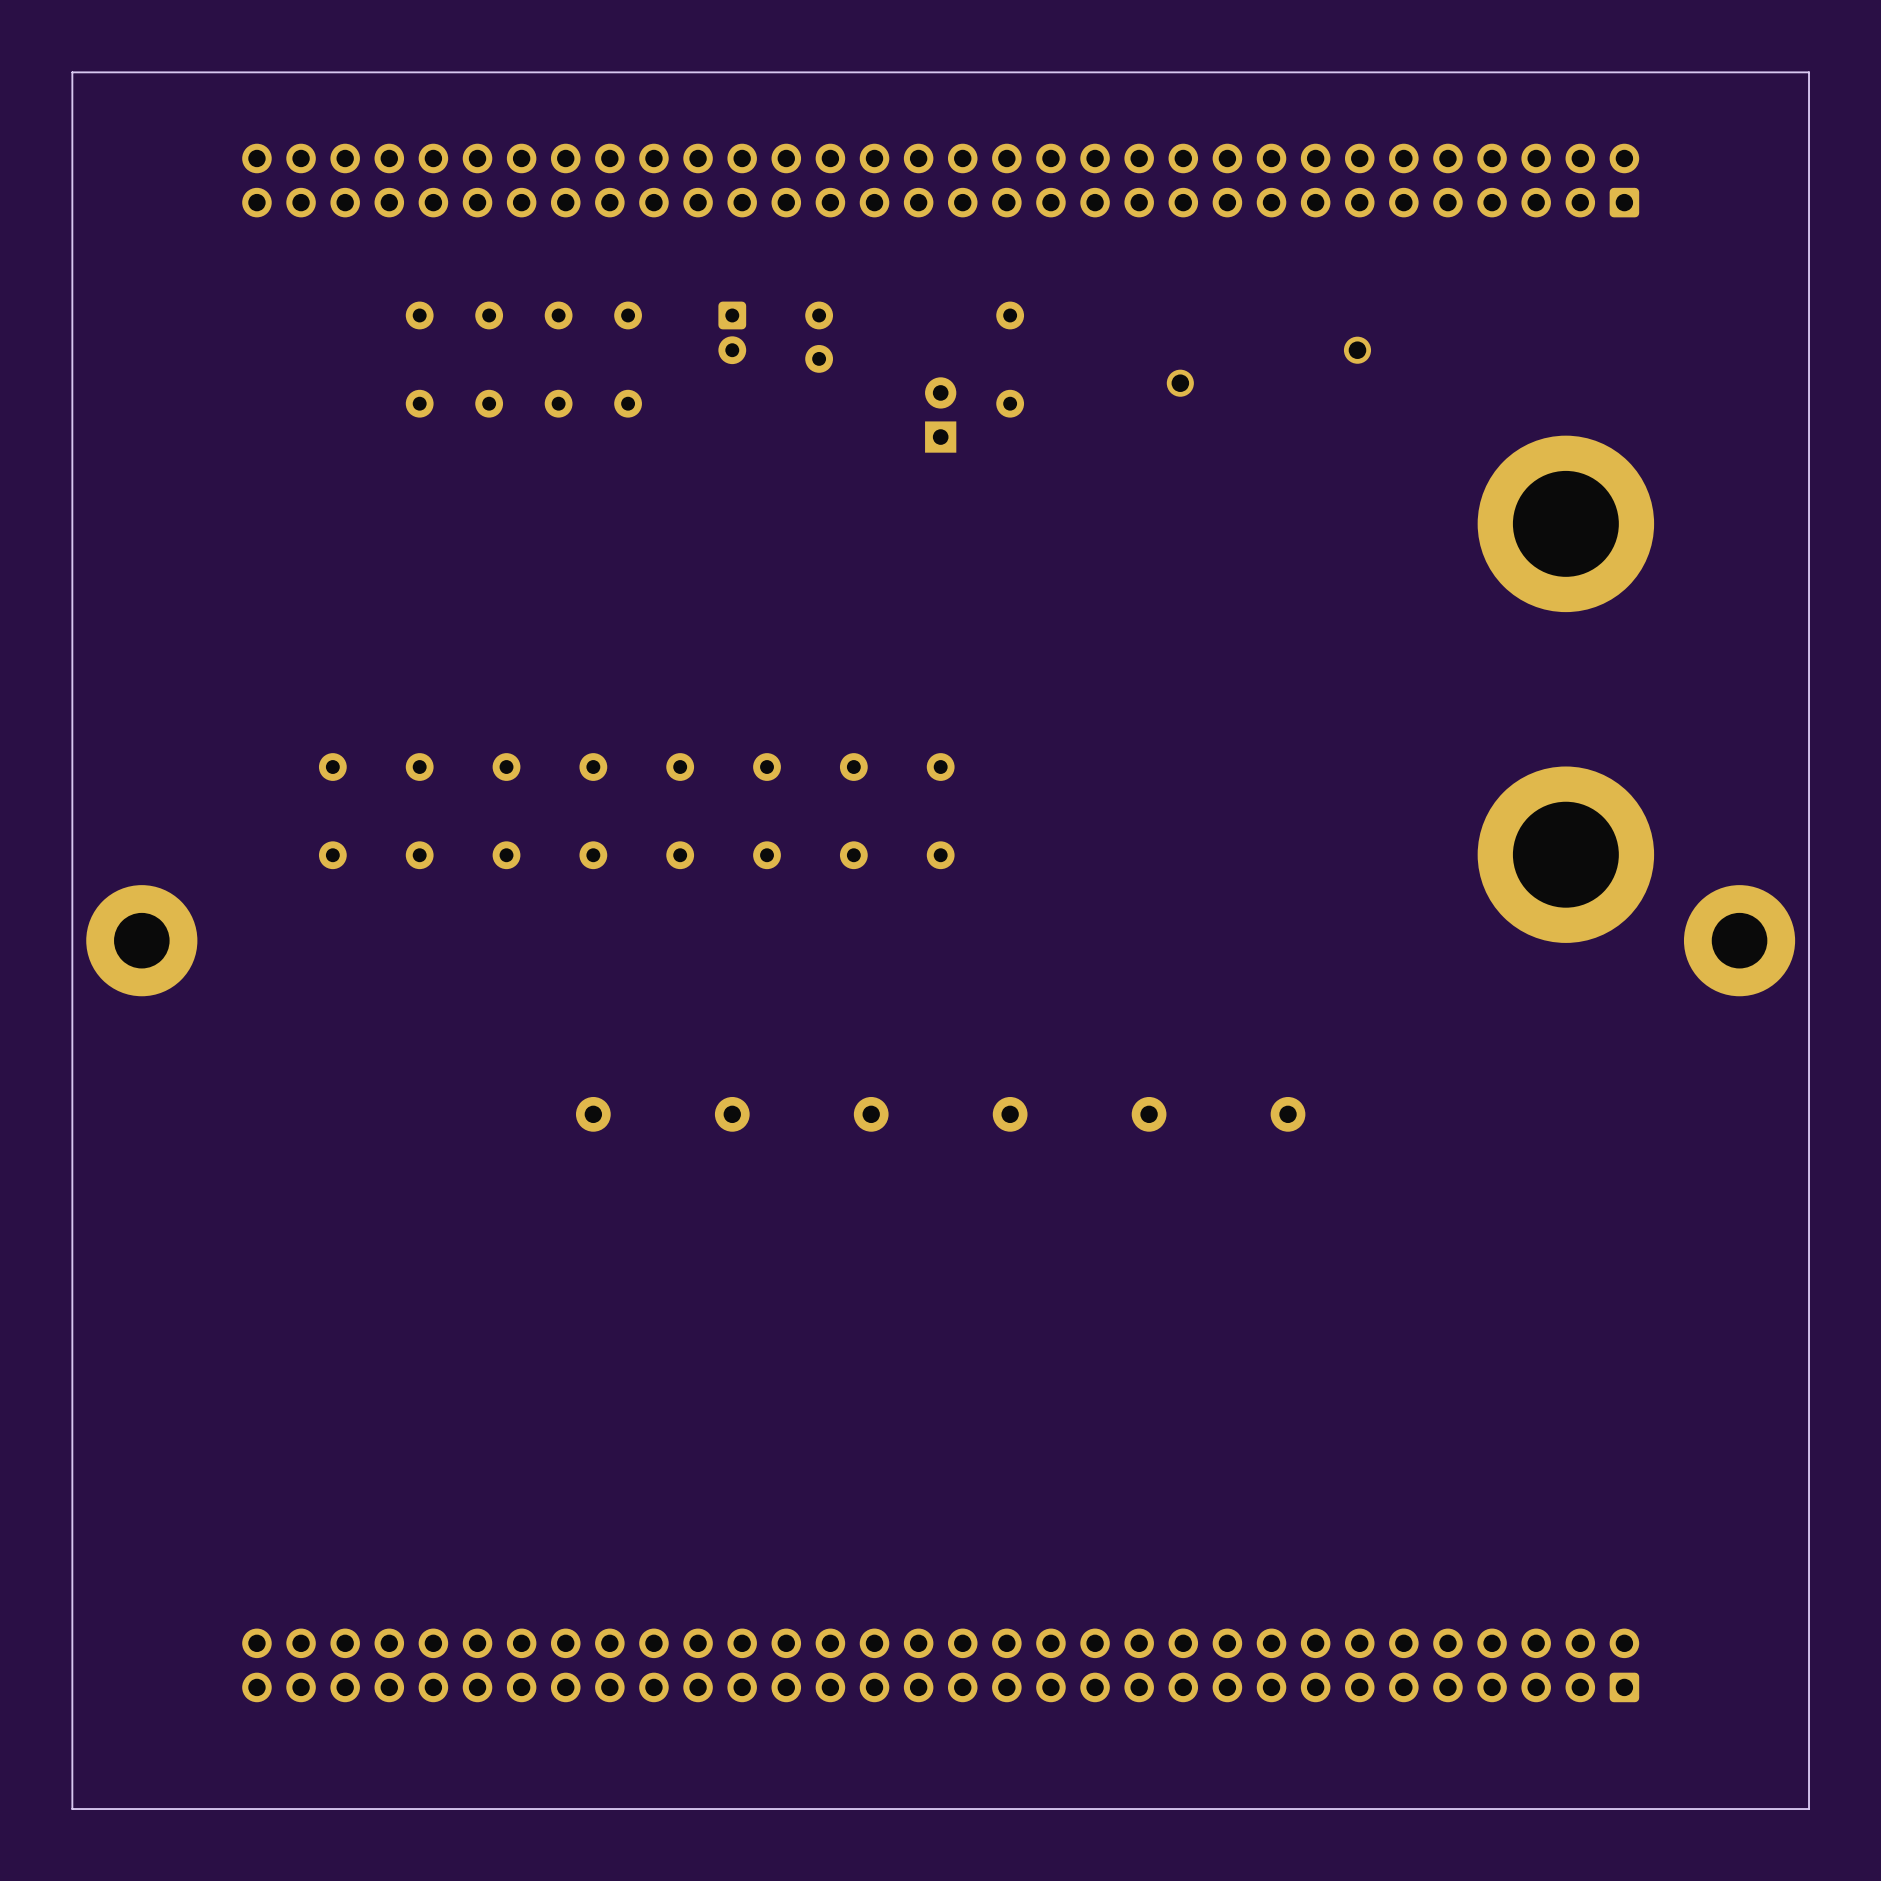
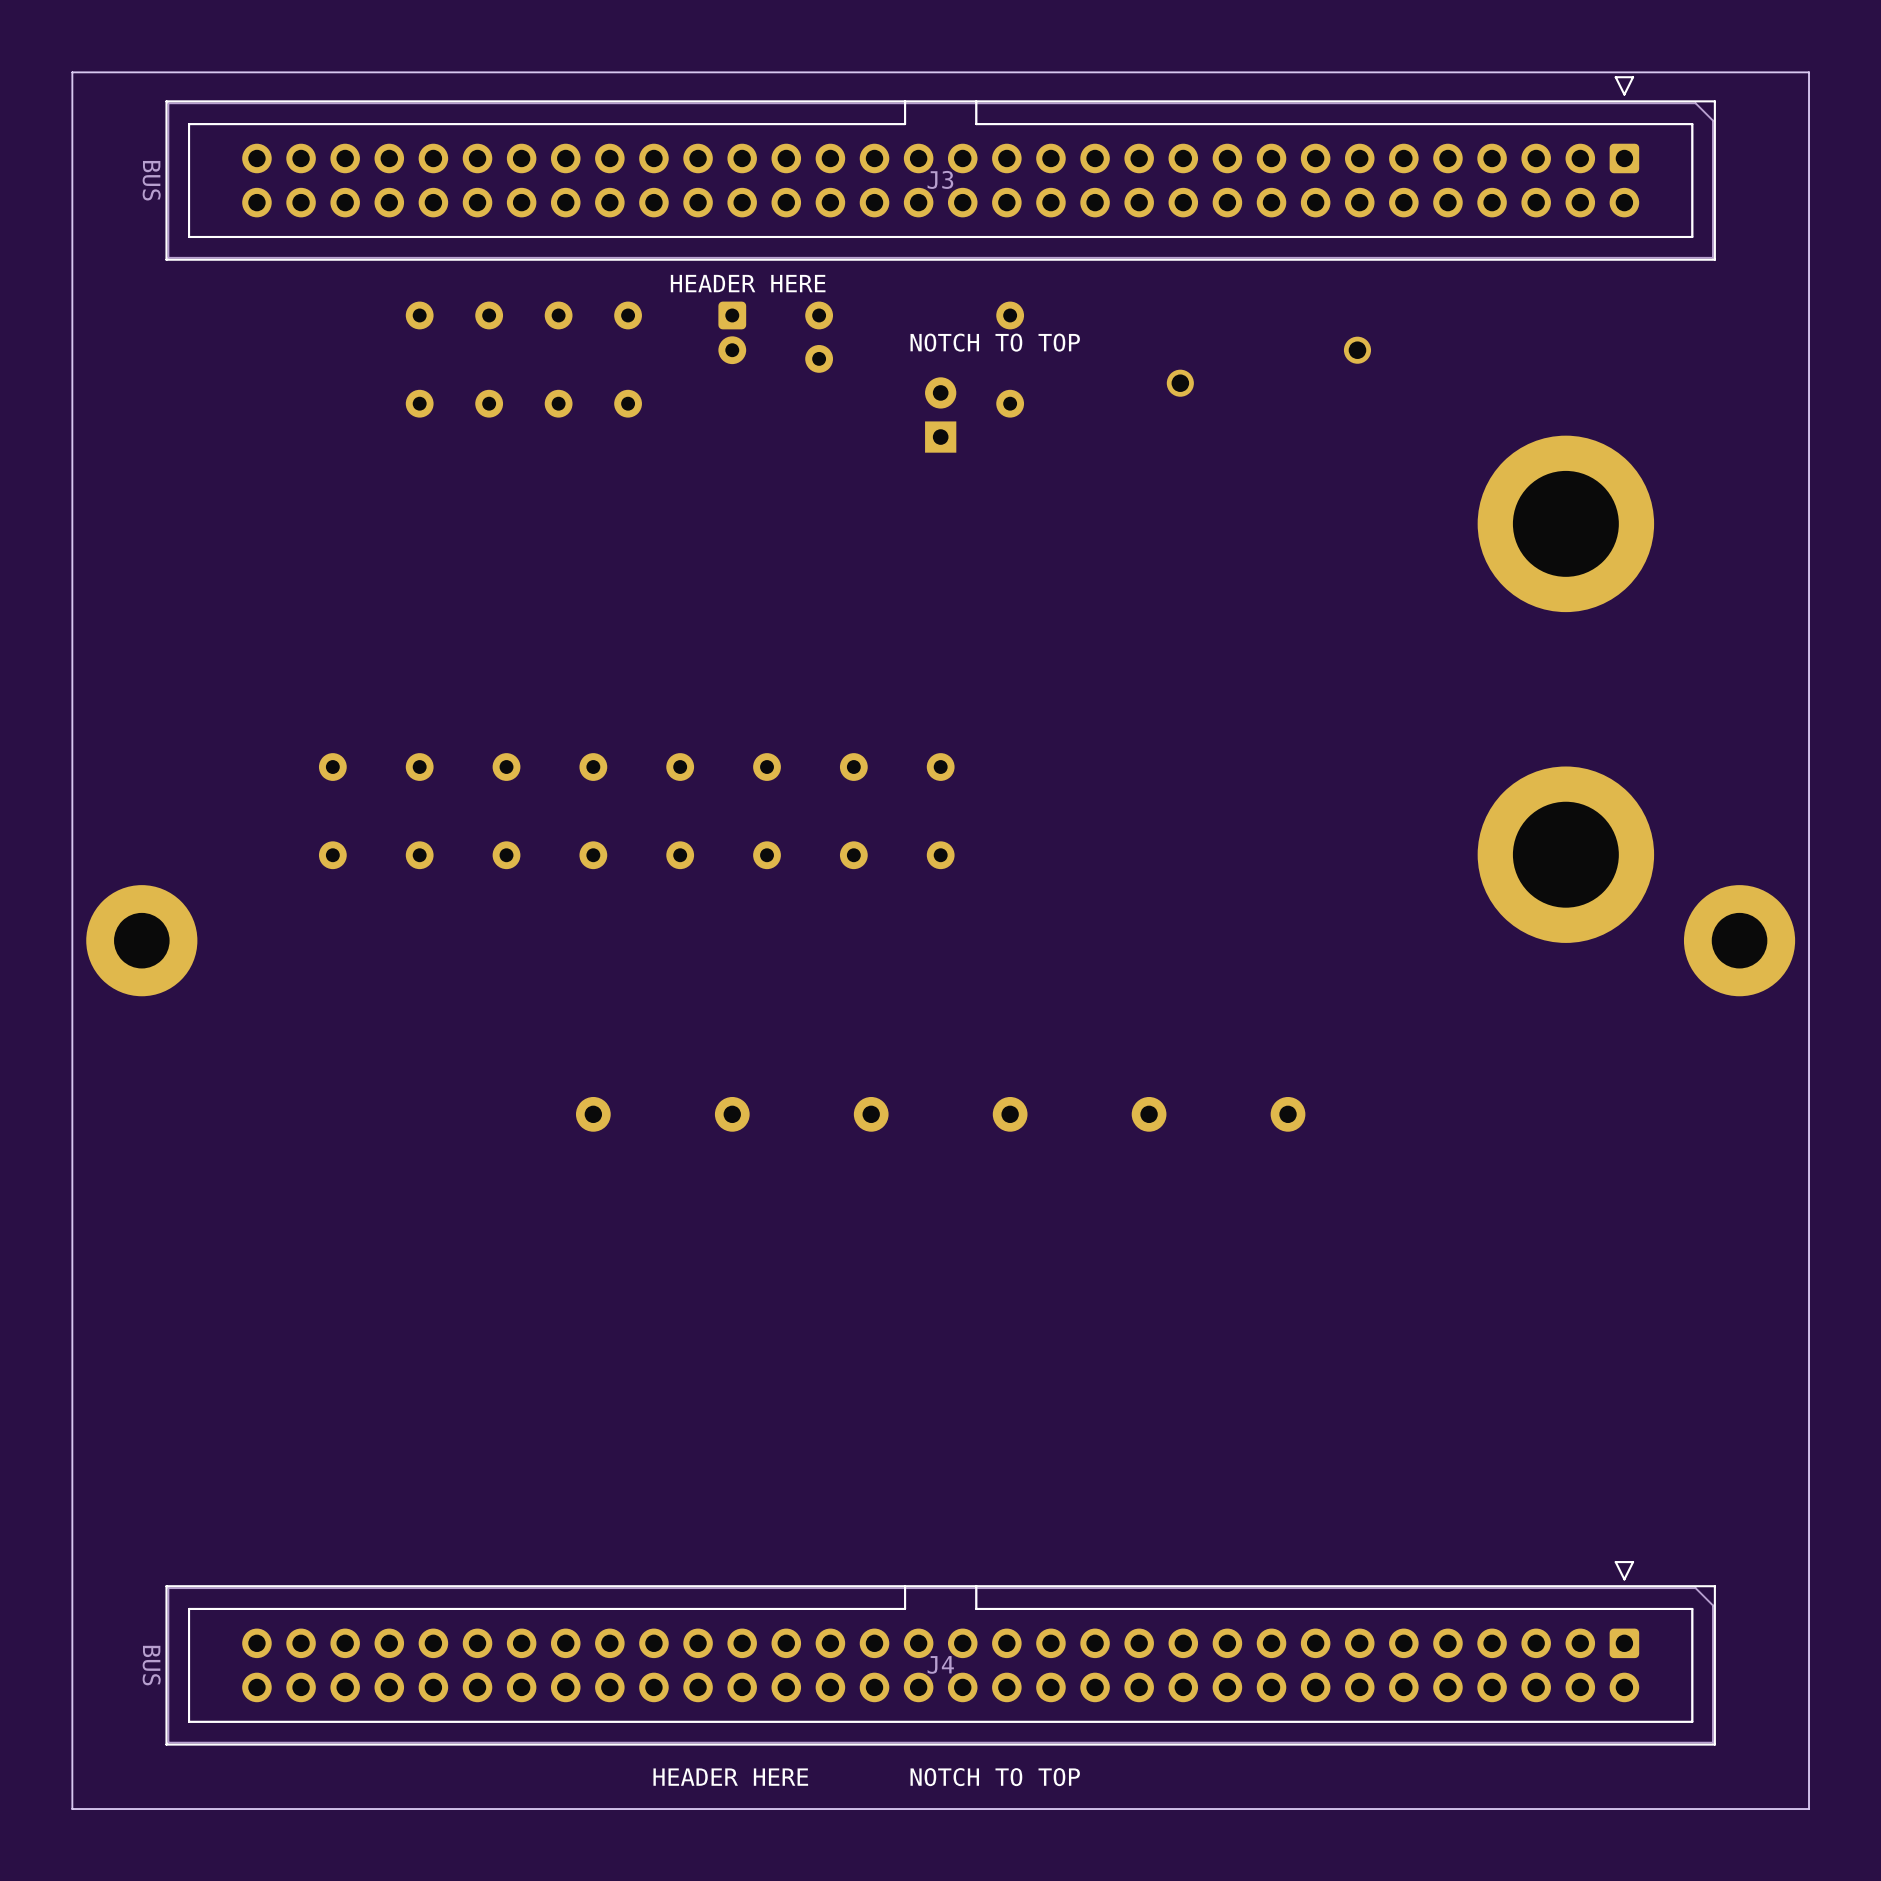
J3 side: top (940, 180) -> bottom (940, 168)
text: none -> HEADER HERE (748, 283)
text: none -> NOTCH TO TOP (995, 342)
J4 side: top (940, 1665) -> bottom (940, 1653)
text: none -> HEADER HERE (730, 1777)
text: none -> NOTCH TO TOP (995, 1777)

